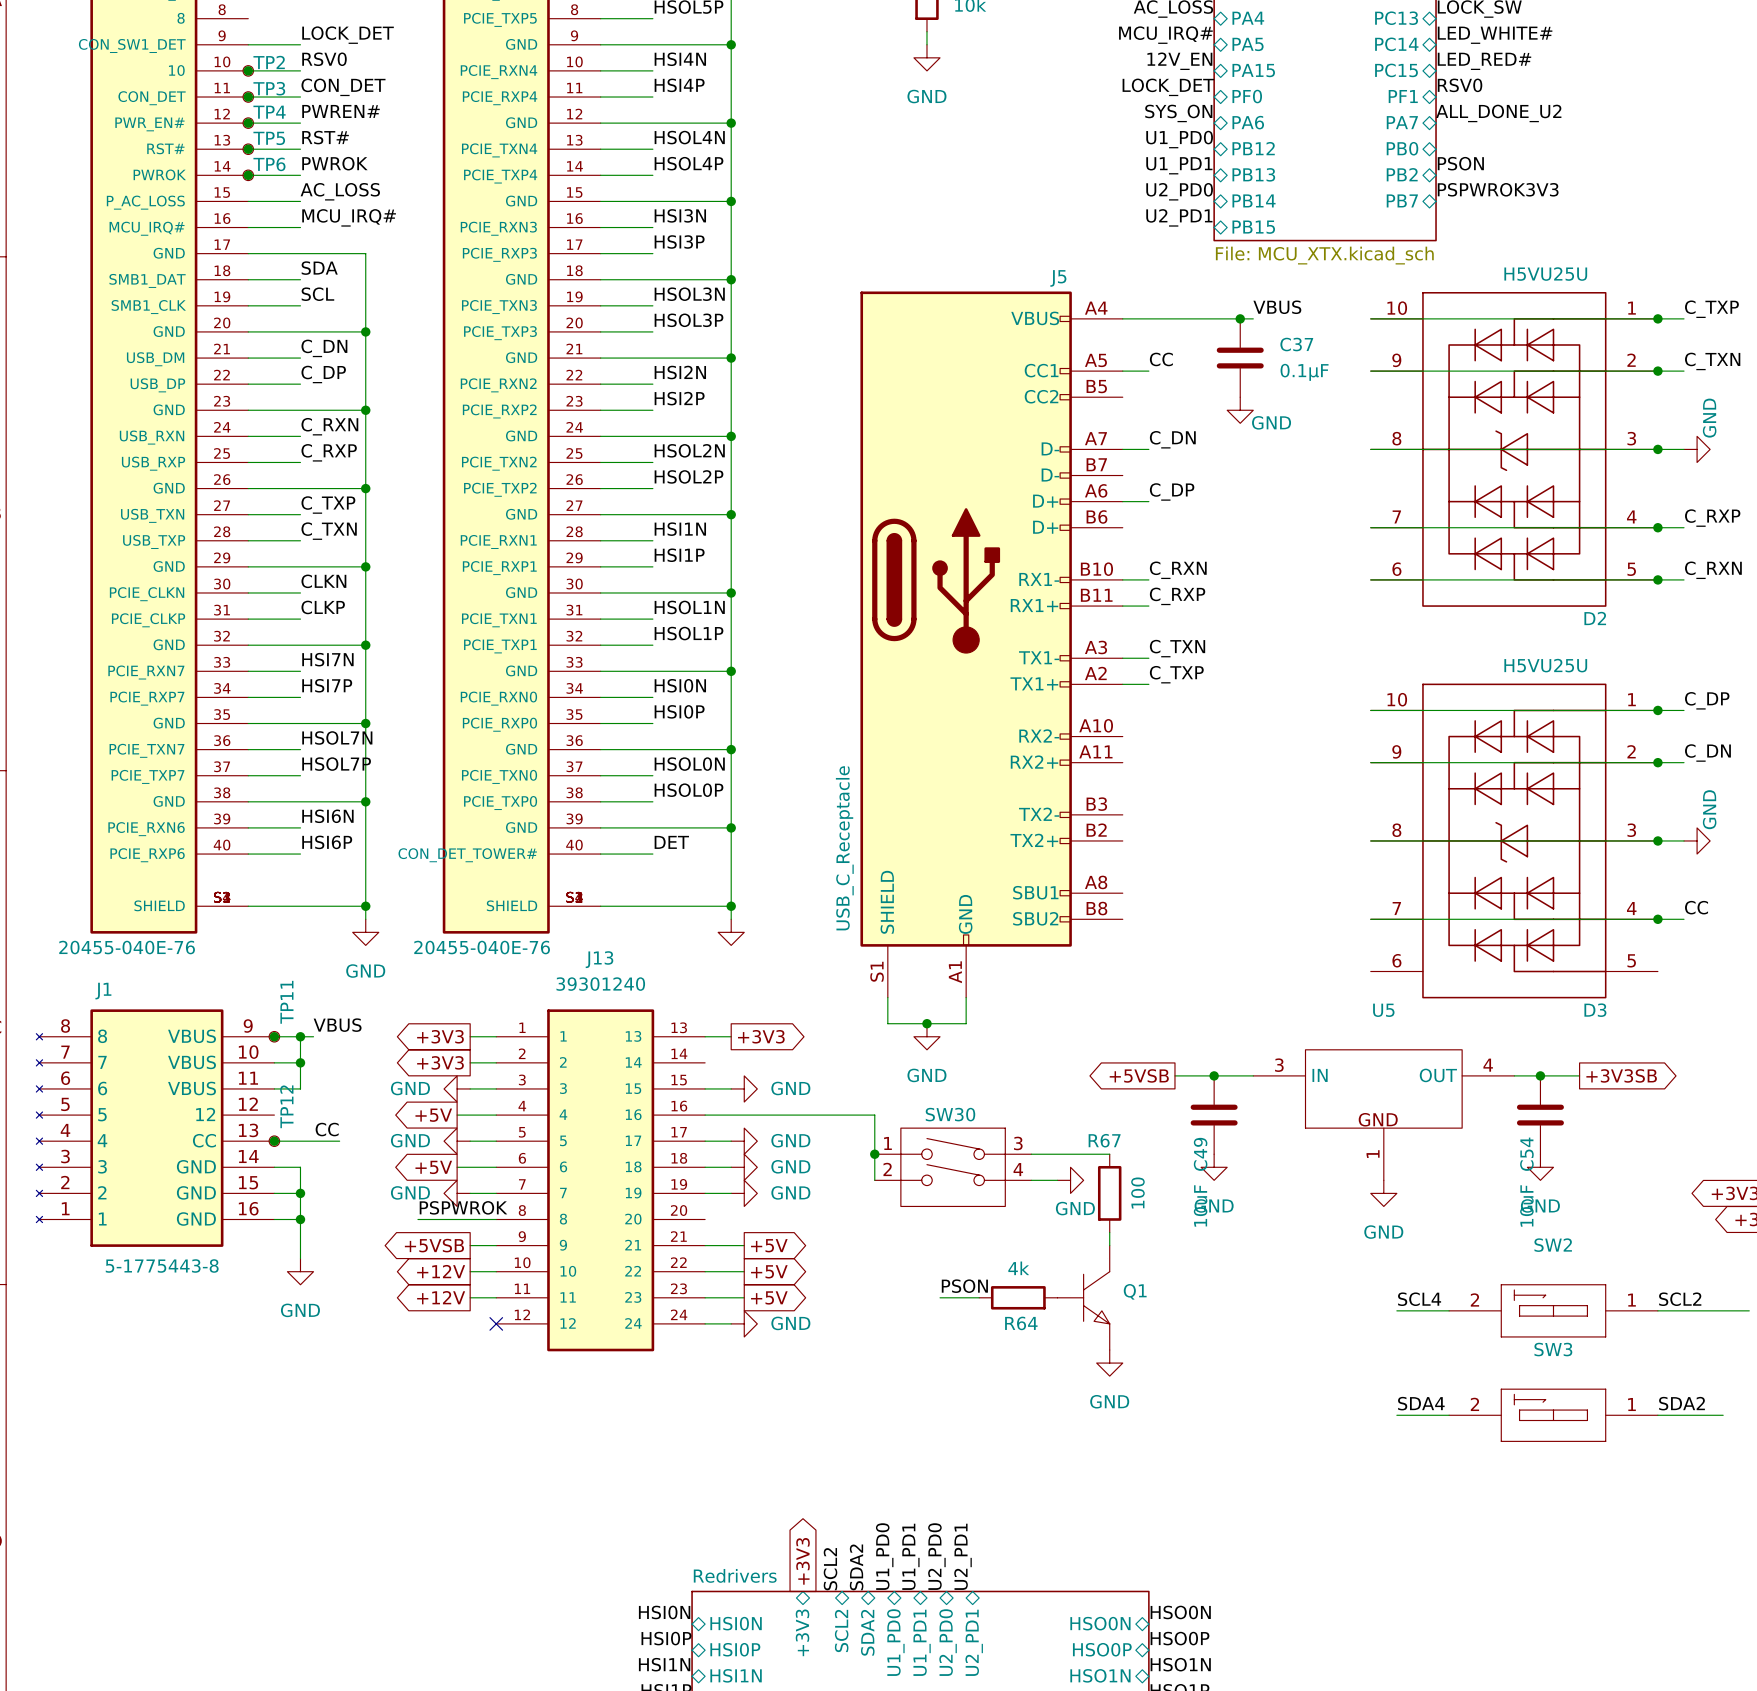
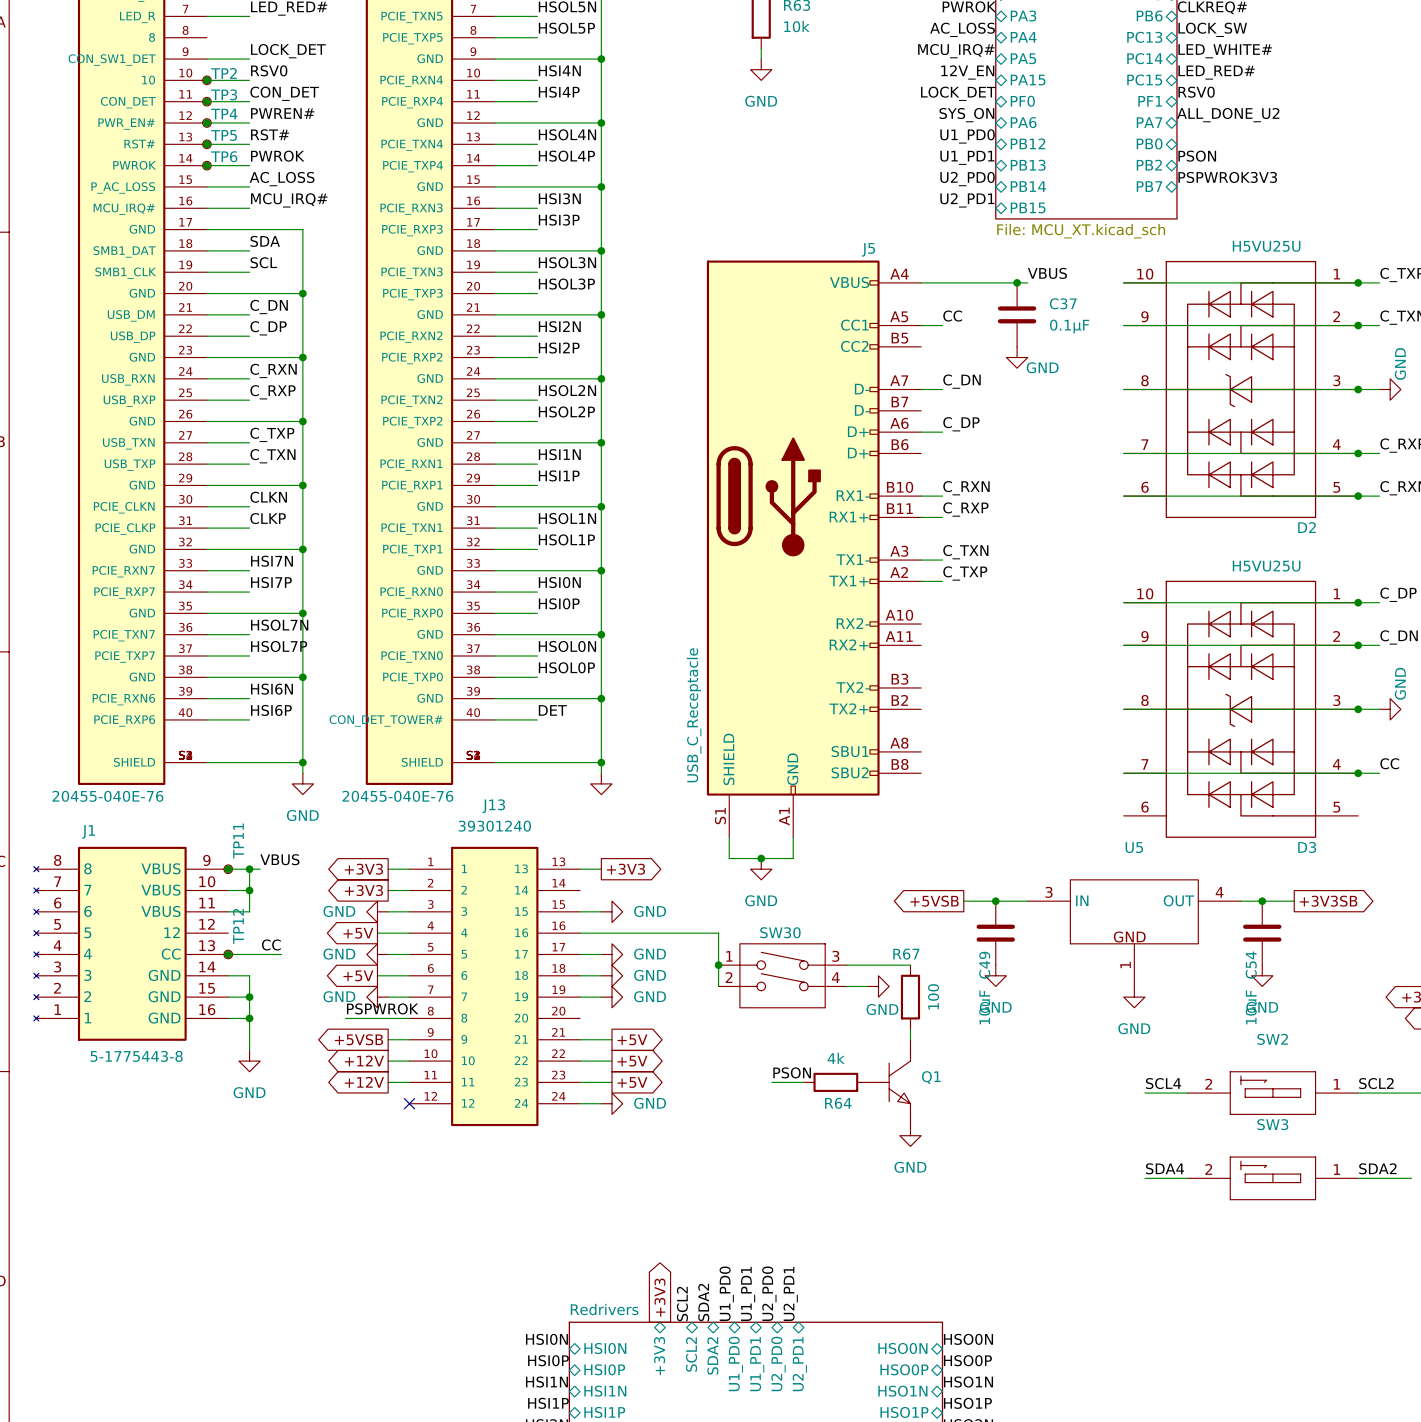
sheet value: File: MCU_XTX.kicad_sch (1324, 255) -> File: MCU_XT.kicad_sch (1081, 231)

